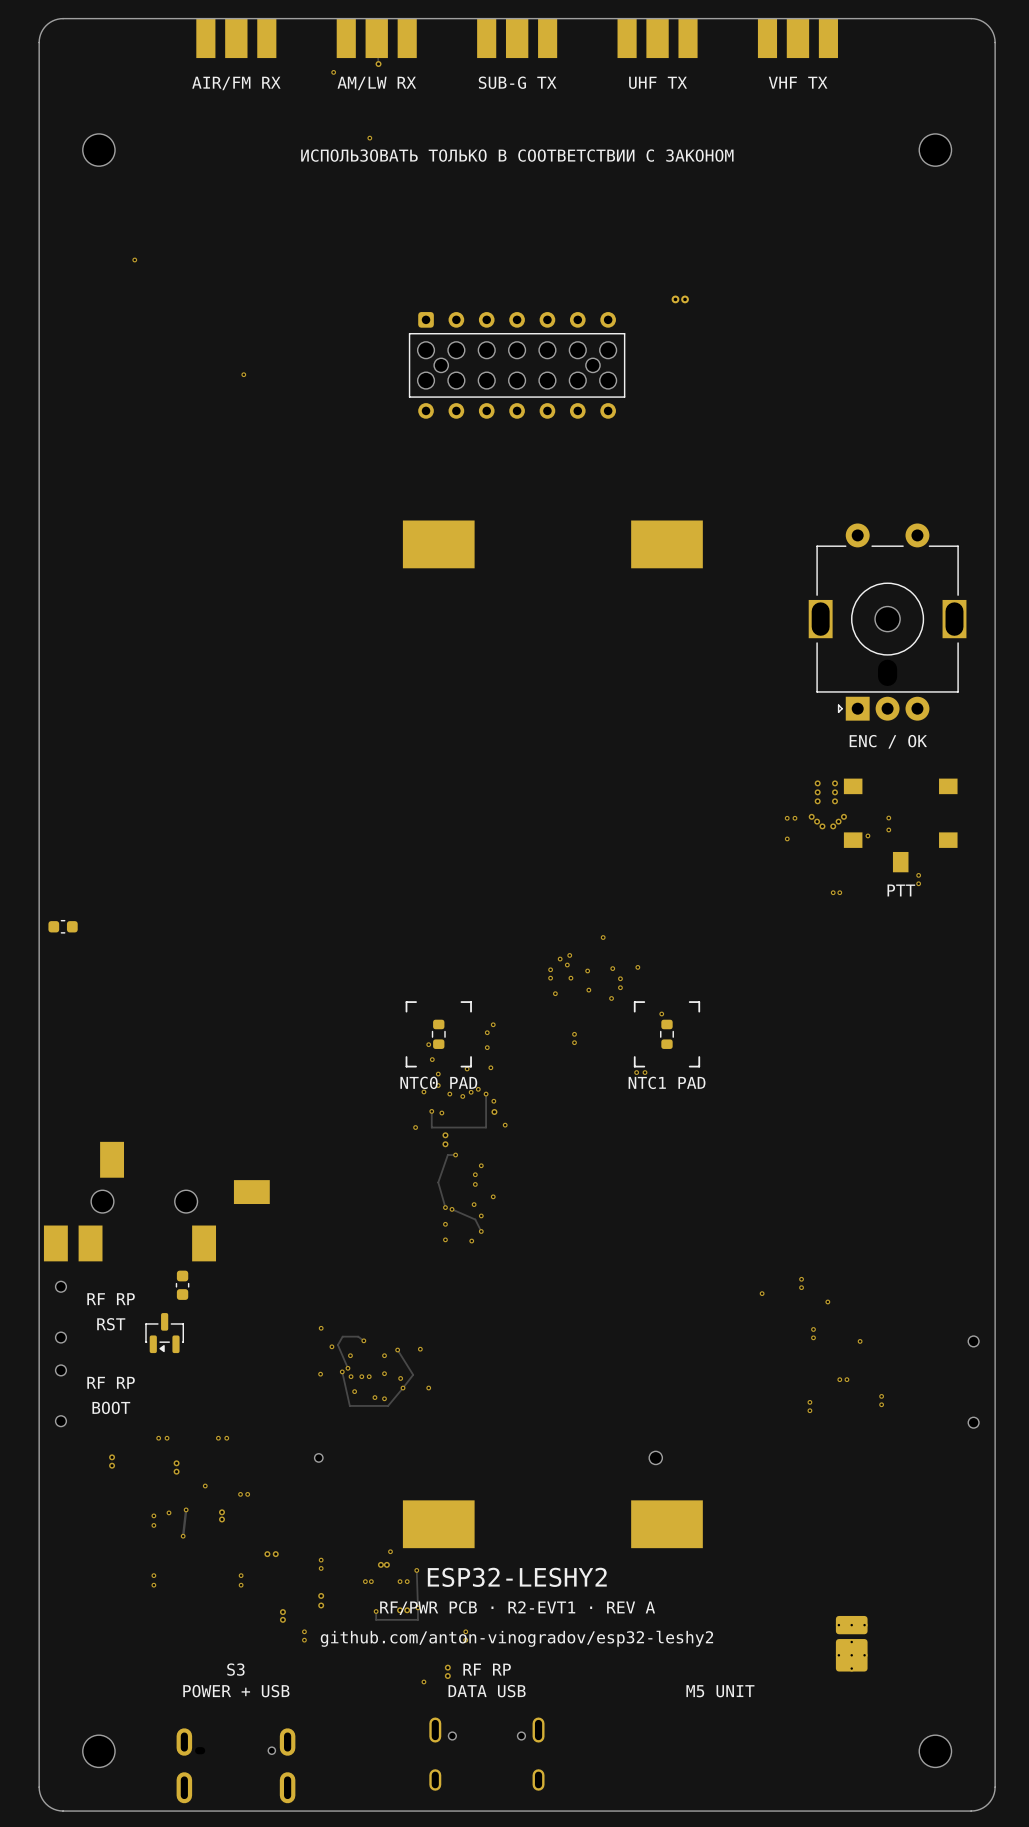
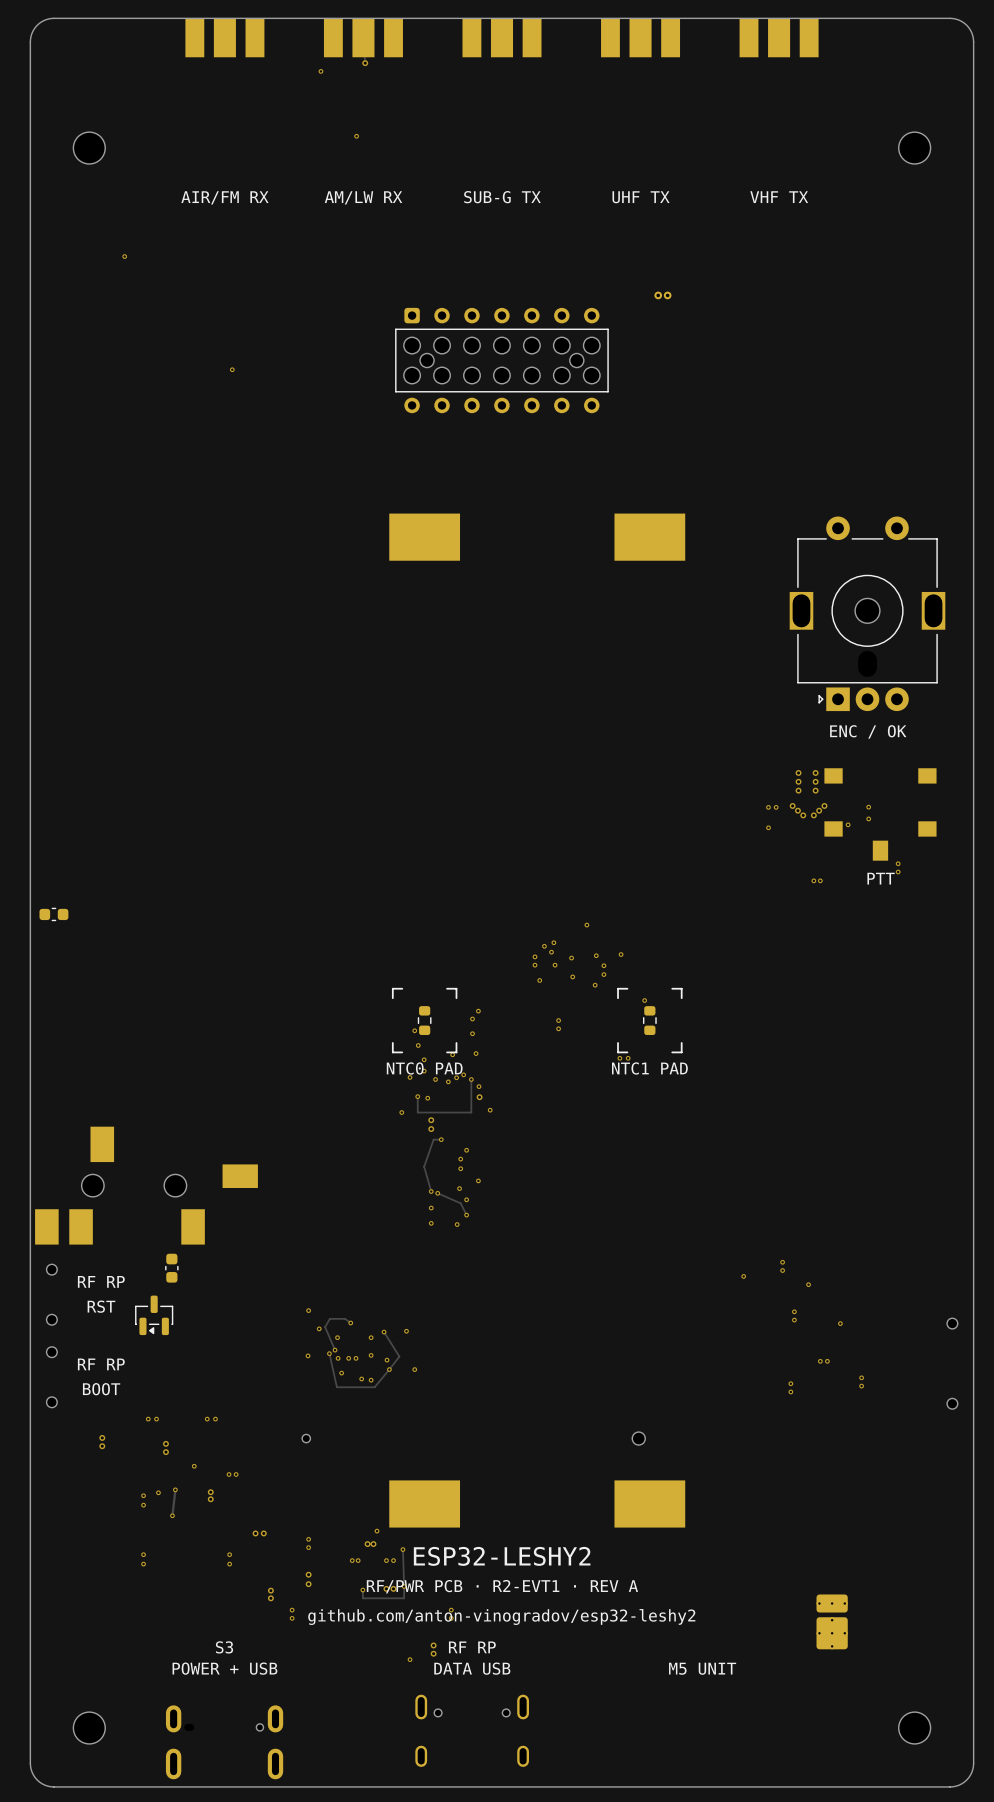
text position: SUB-G TX (517, 82) -> SUB-G TX (502, 197)
text position: UHF TX (658, 82) -> UHF TX (641, 197)
text position: VHF TX (798, 82) -> VHF TX (779, 197)
text position: AIR/FM RX (236, 83) -> AIR/FM RX (224, 197)
text position: AM/LW RX (376, 83) -> AM/LW RX (363, 197)
text: ИСПОЛЬЗОВАТЬ ТОЛЬКО В СООТВЕТСТВИИ С ЗАКОНОМ (517, 155) -> none

